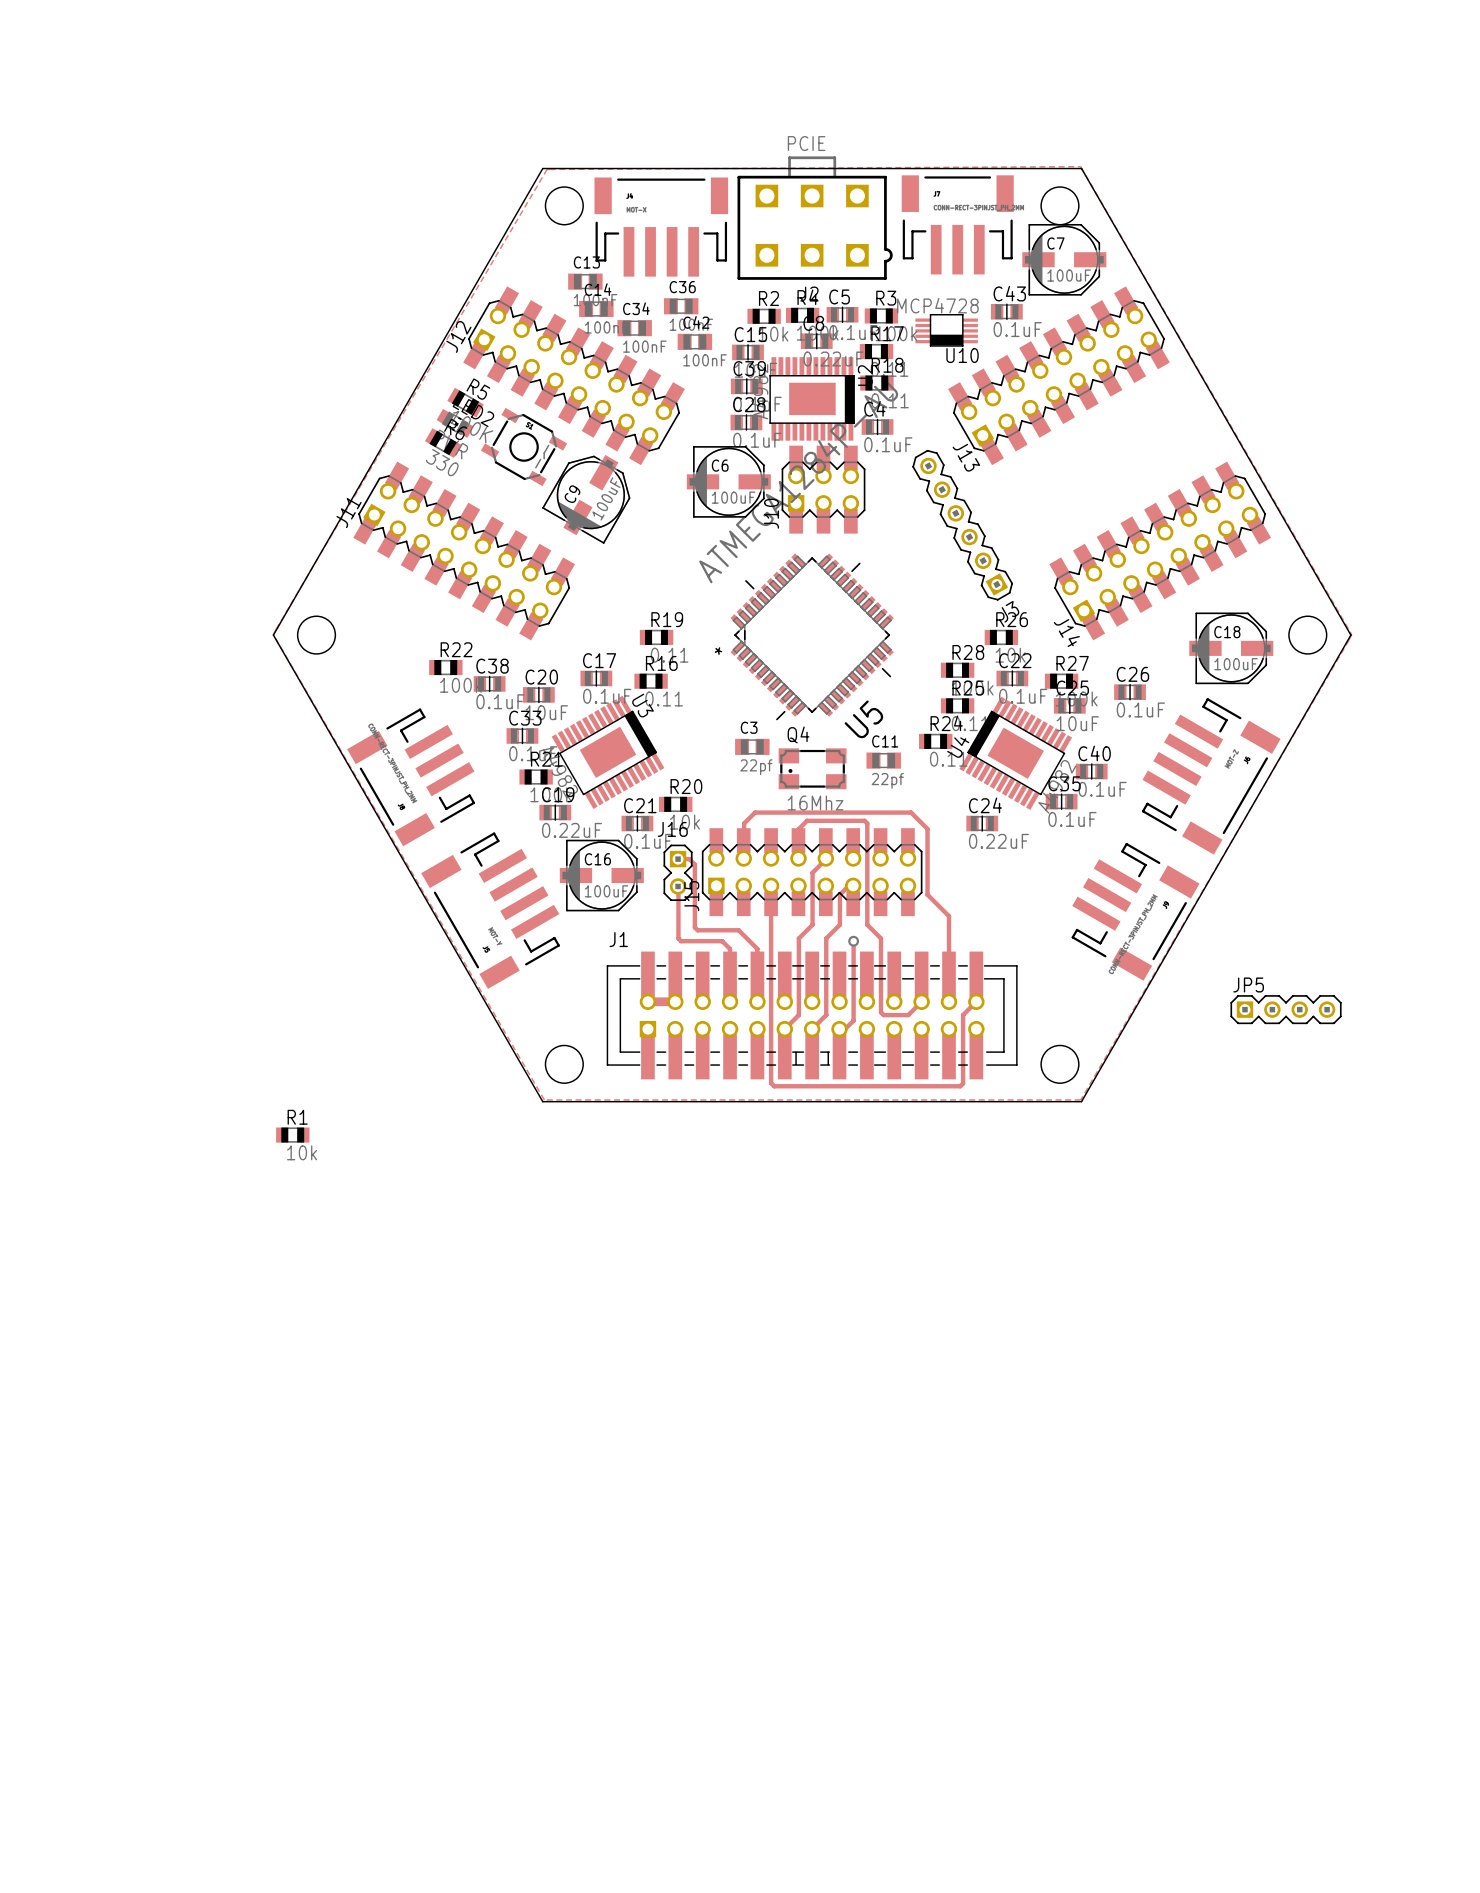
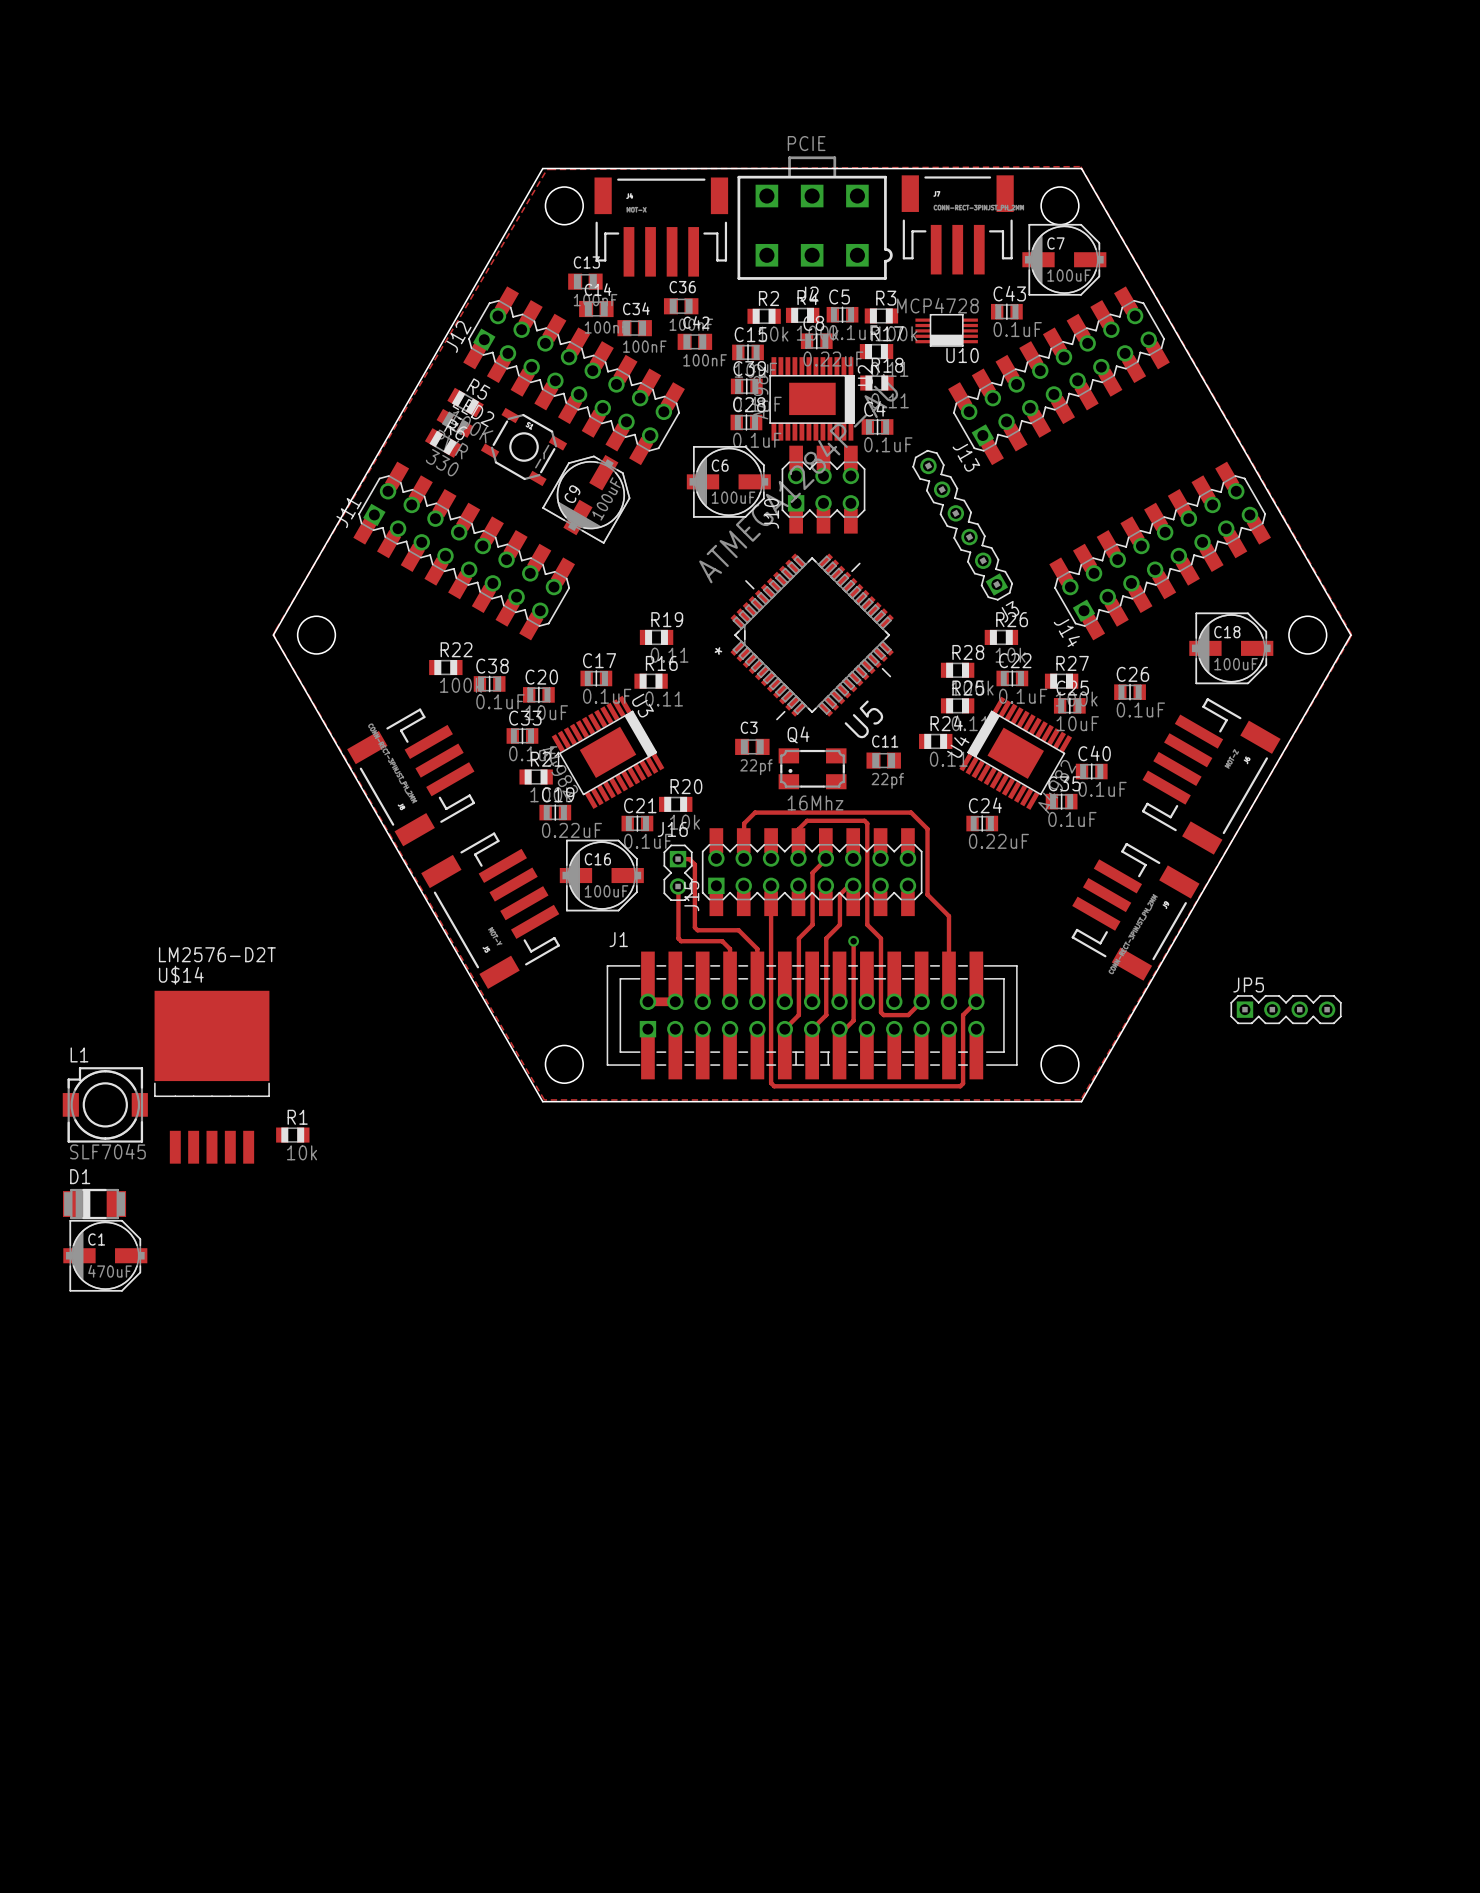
U$14: none -> LM2576-D2T (211, 1077)
L1: none -> SLF7045 (105, 1104)
D1: none -> (94, 1204)
C1: none -> 470uF (105, 1255)

